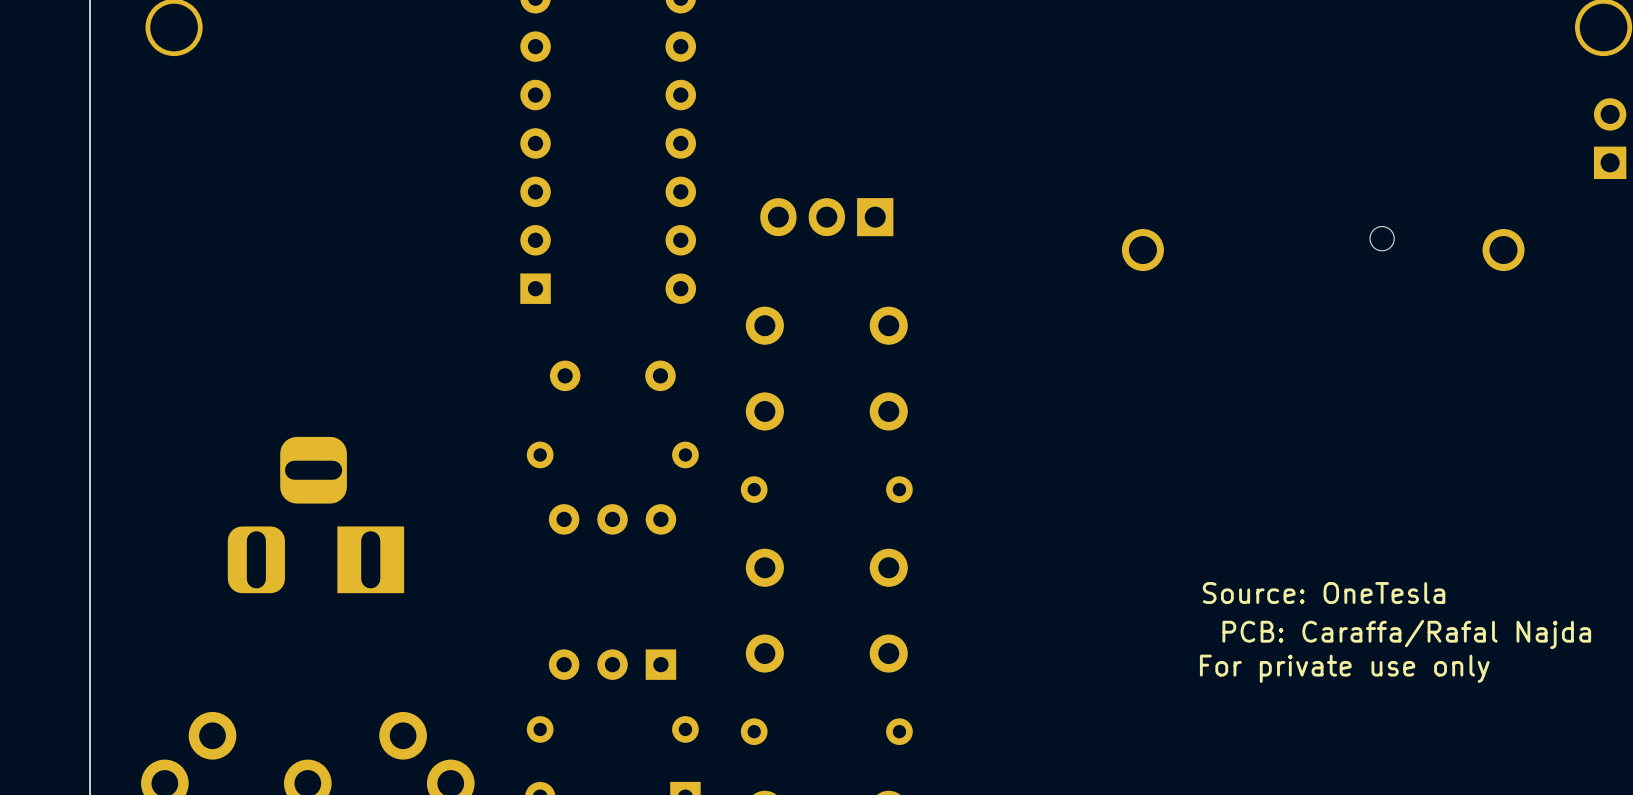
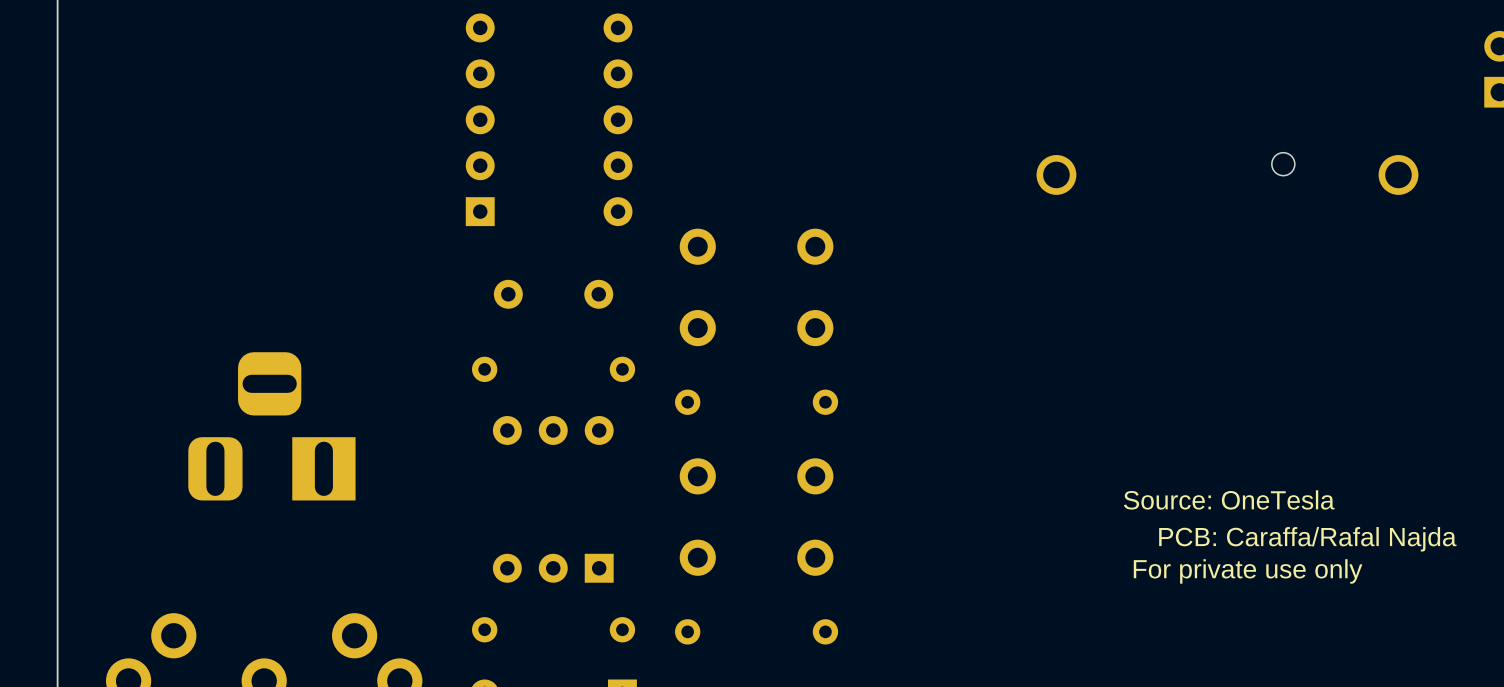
part: (826, 217) -> none

